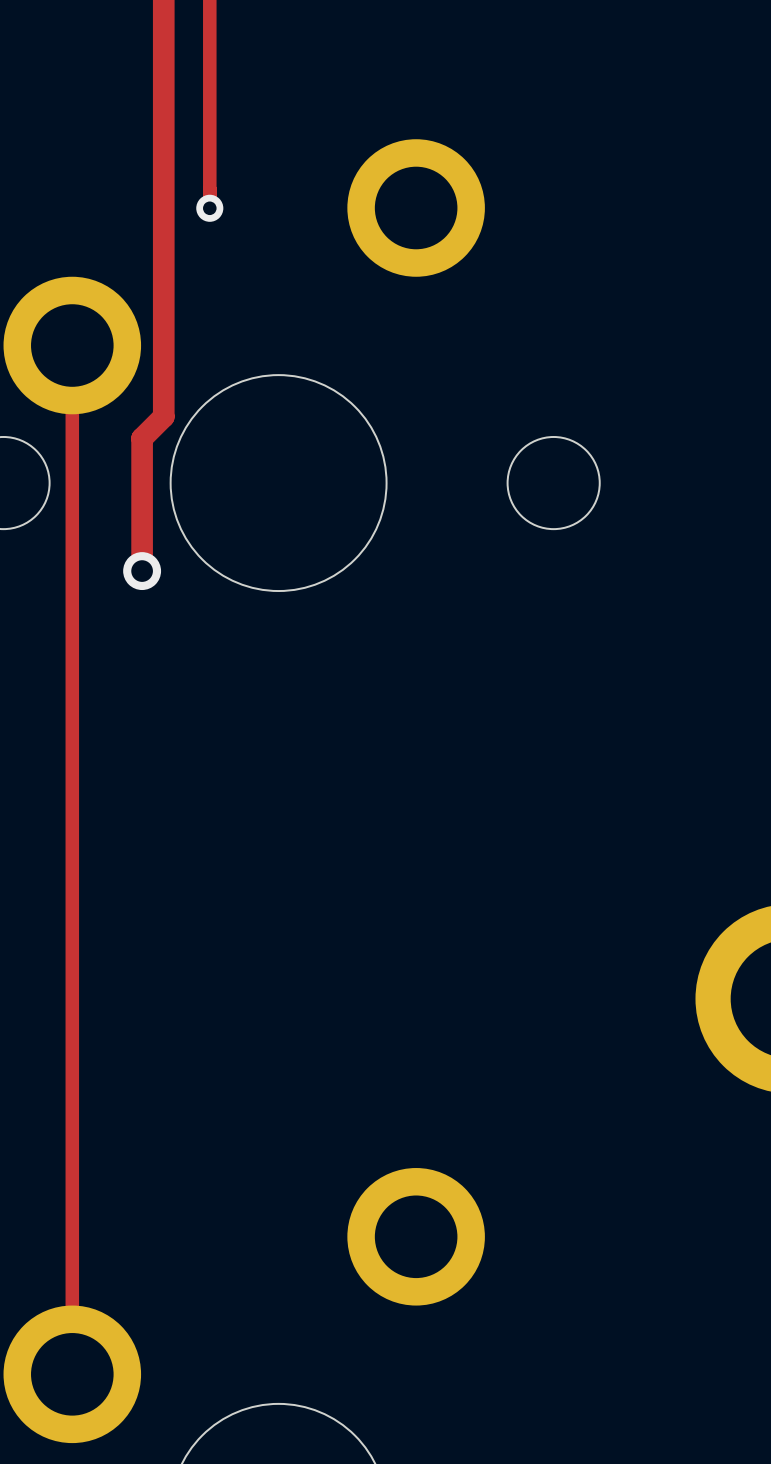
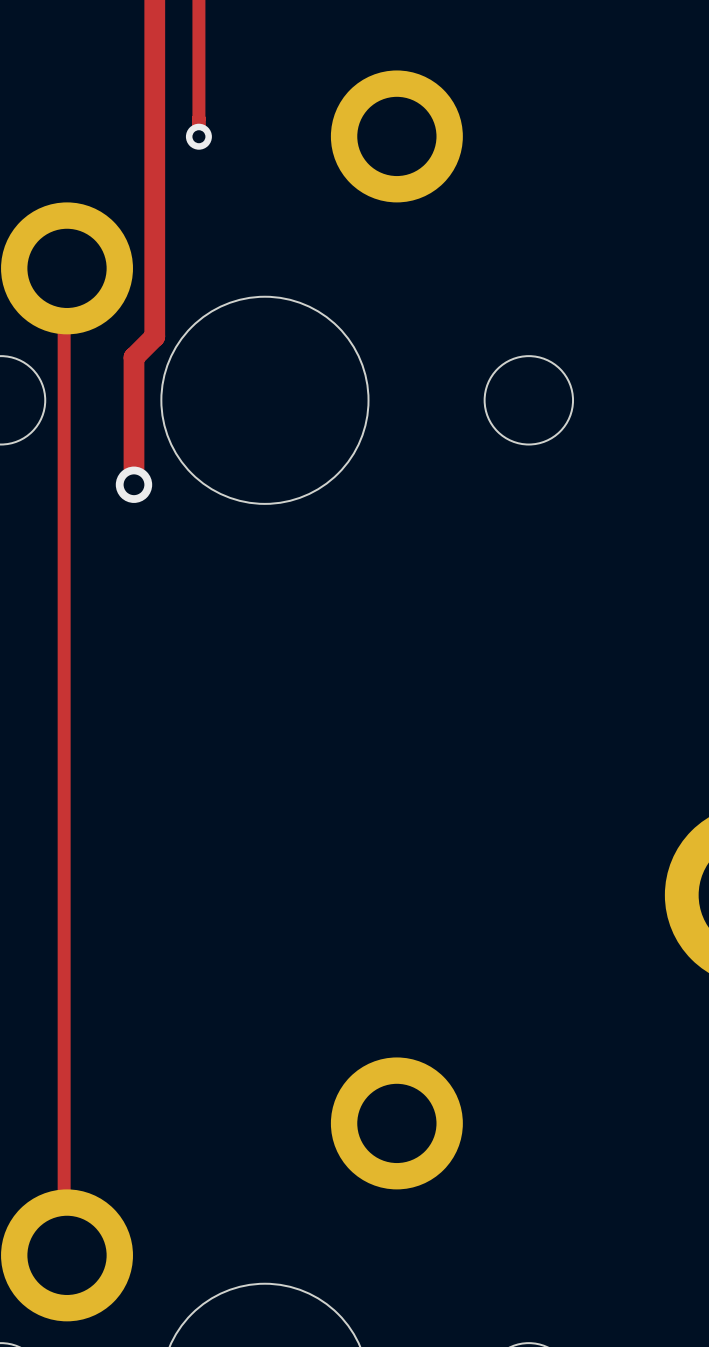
track: (72, 345) (72, 1374) -> none
track: none -> (64, 273) (64, 1263)

